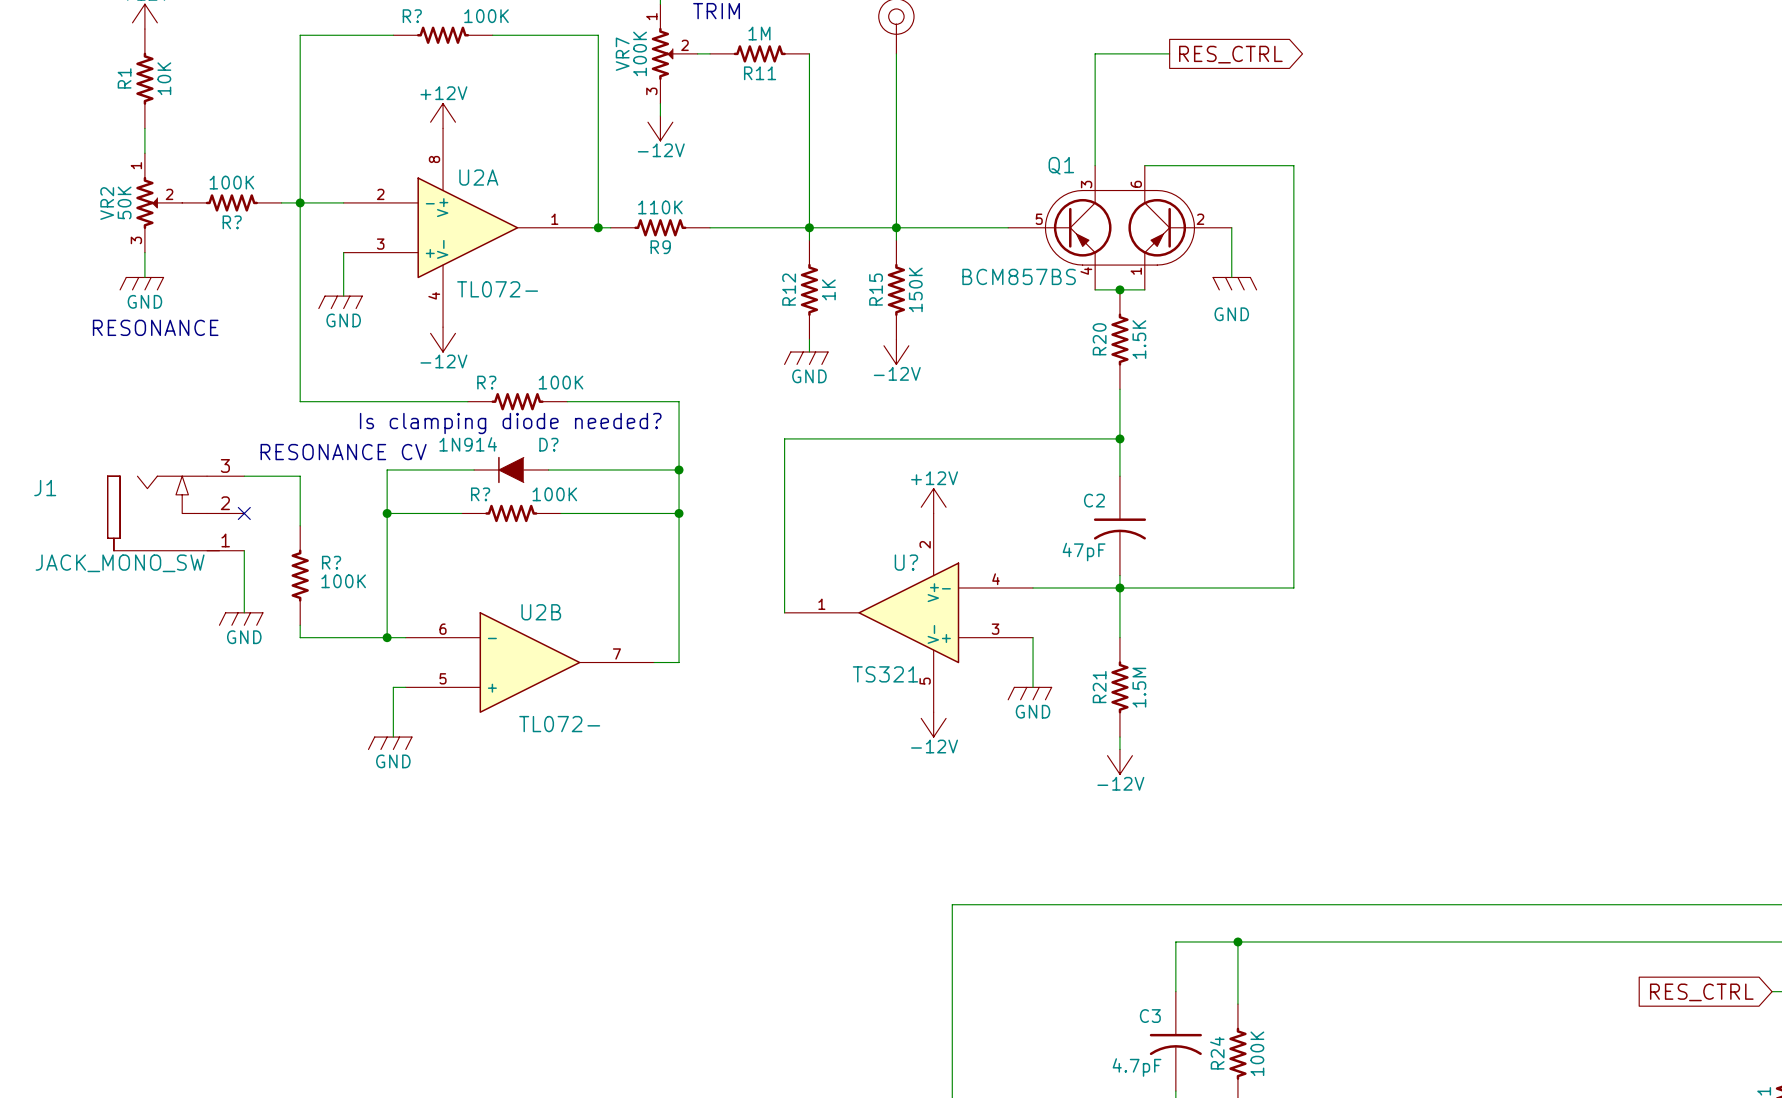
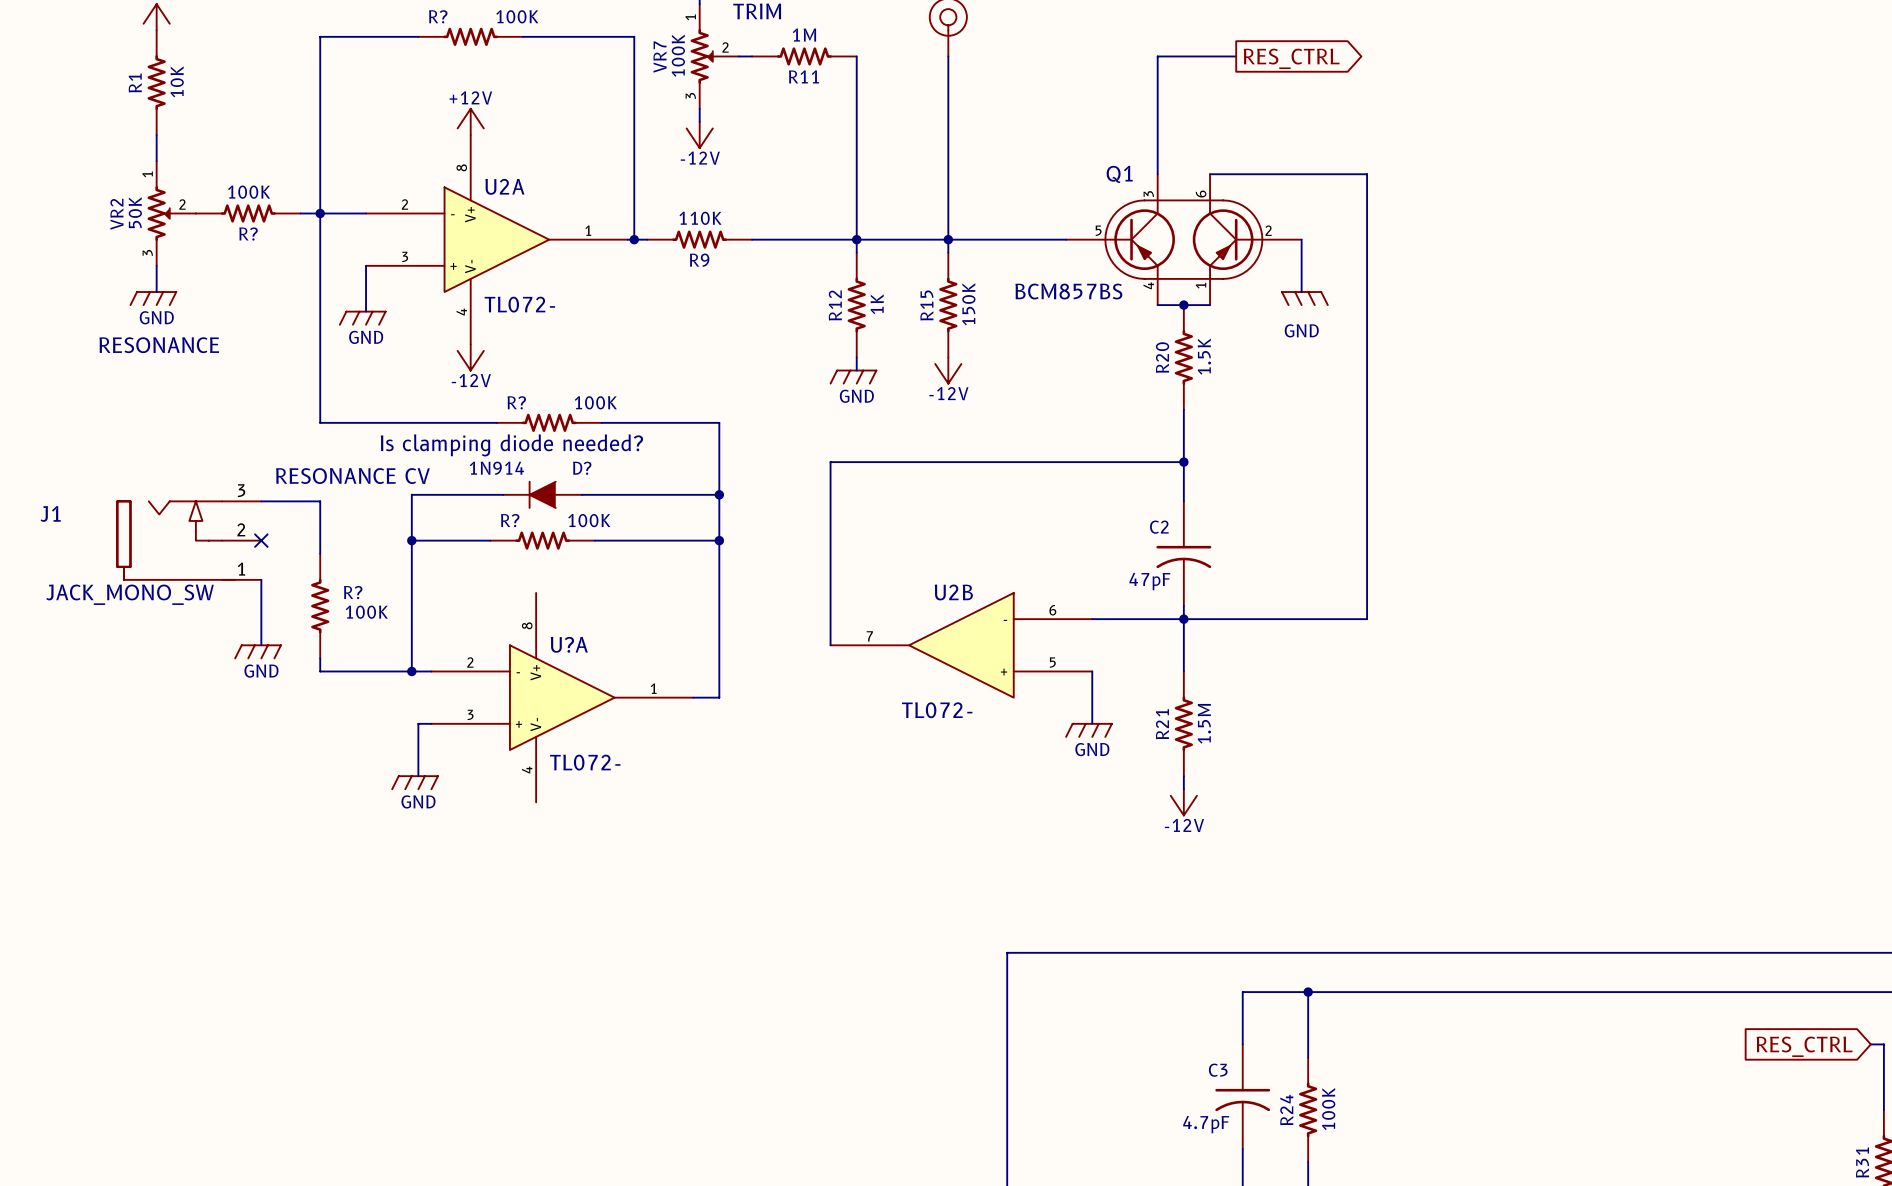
power symbol: +12V (933, 501) -> none
U?: TS321 (908, 612) -> none
U2B flip: as is (529, 662) -> left-right (961, 645)
U2B position: (529, 662) -> (961, 645)
U?A: none -> TL072- (562, 697)
power symbol: -12V (933, 724) -> none

